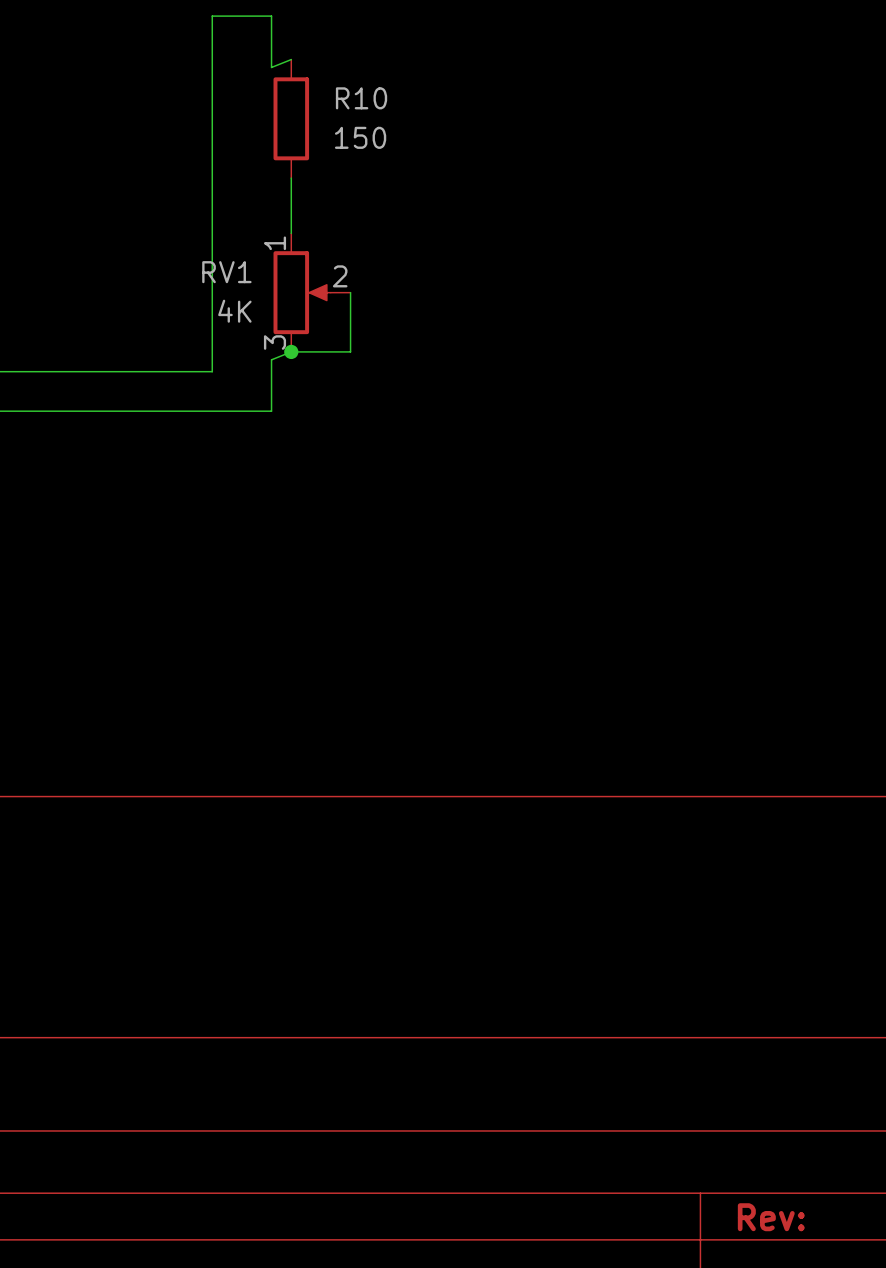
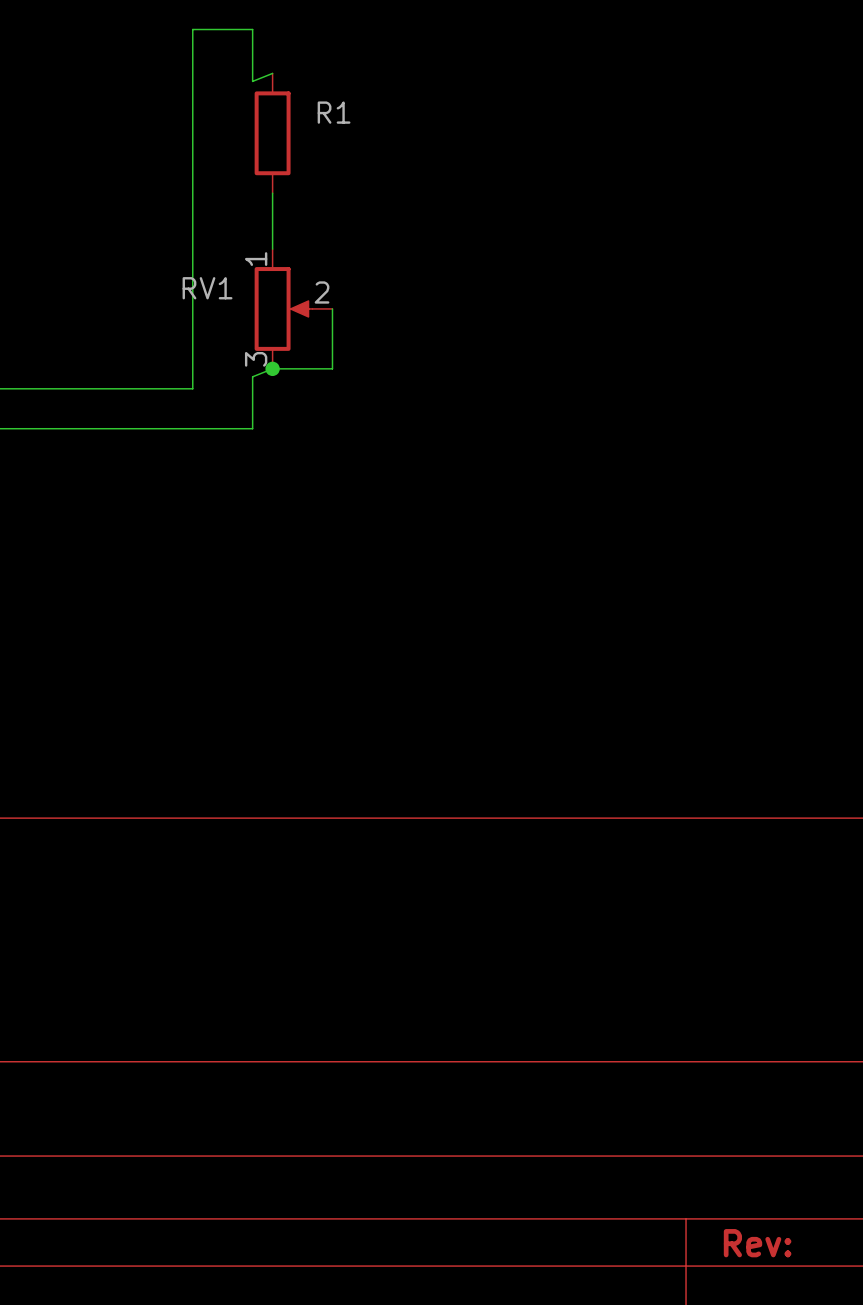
R10 name: R10 (361, 98) -> R1 (334, 112)
R10 value: 150 (360, 137) -> none
RV1 value: 4K (234, 311) -> none

